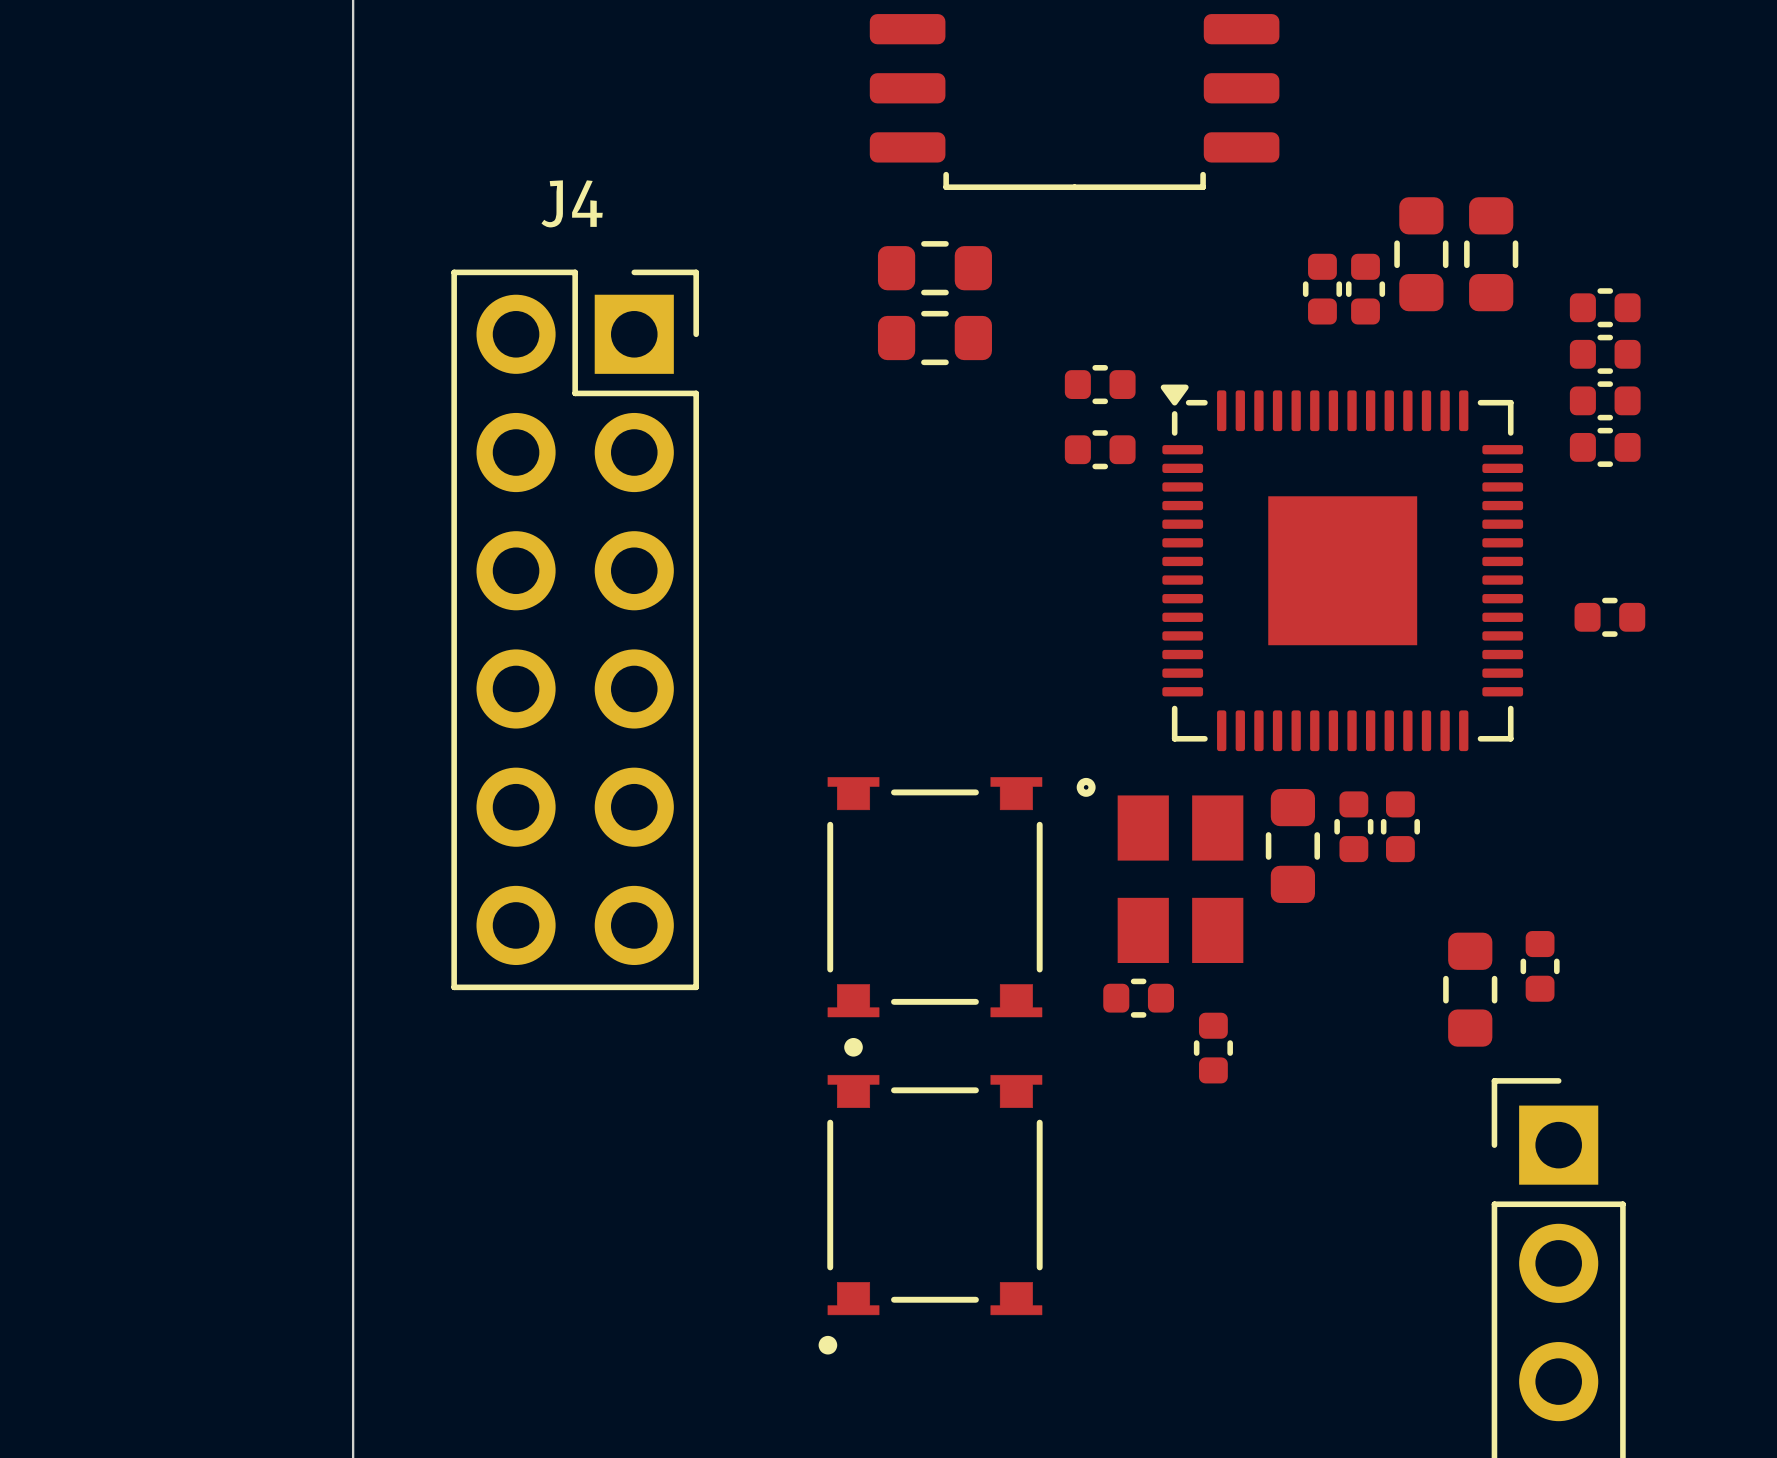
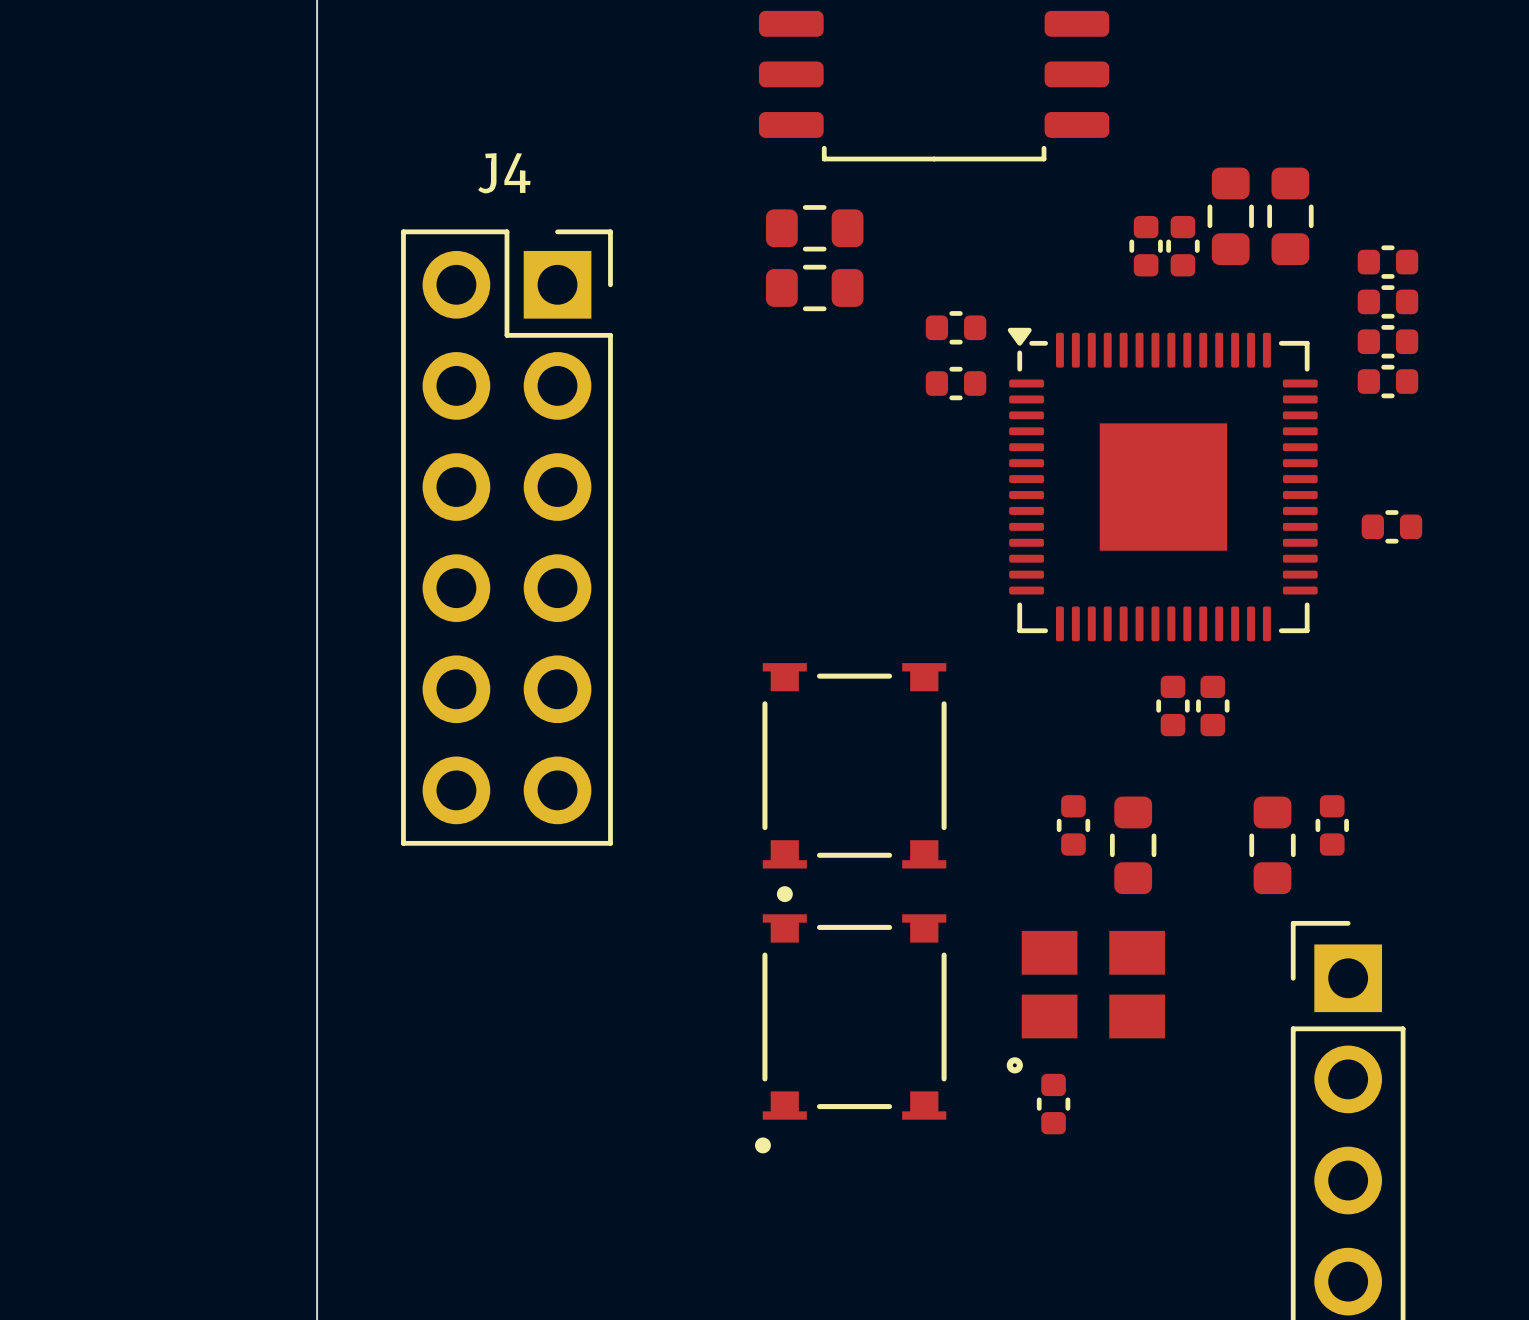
part position: (1292, 845) -> (1133, 845)
part rotation: 0° (1160, 870) -> 90° counterclockwise (1085, 1002)
part position: (1160, 870) -> (1085, 1002)
part position: (934, 916) -> (854, 782)
part: none -> (1073, 825)
part: (1138, 998) -> none
part: (1213, 1048) -> none
part position: (930, 1214) -> (850, 1033)
part: none -> (1053, 1104)

